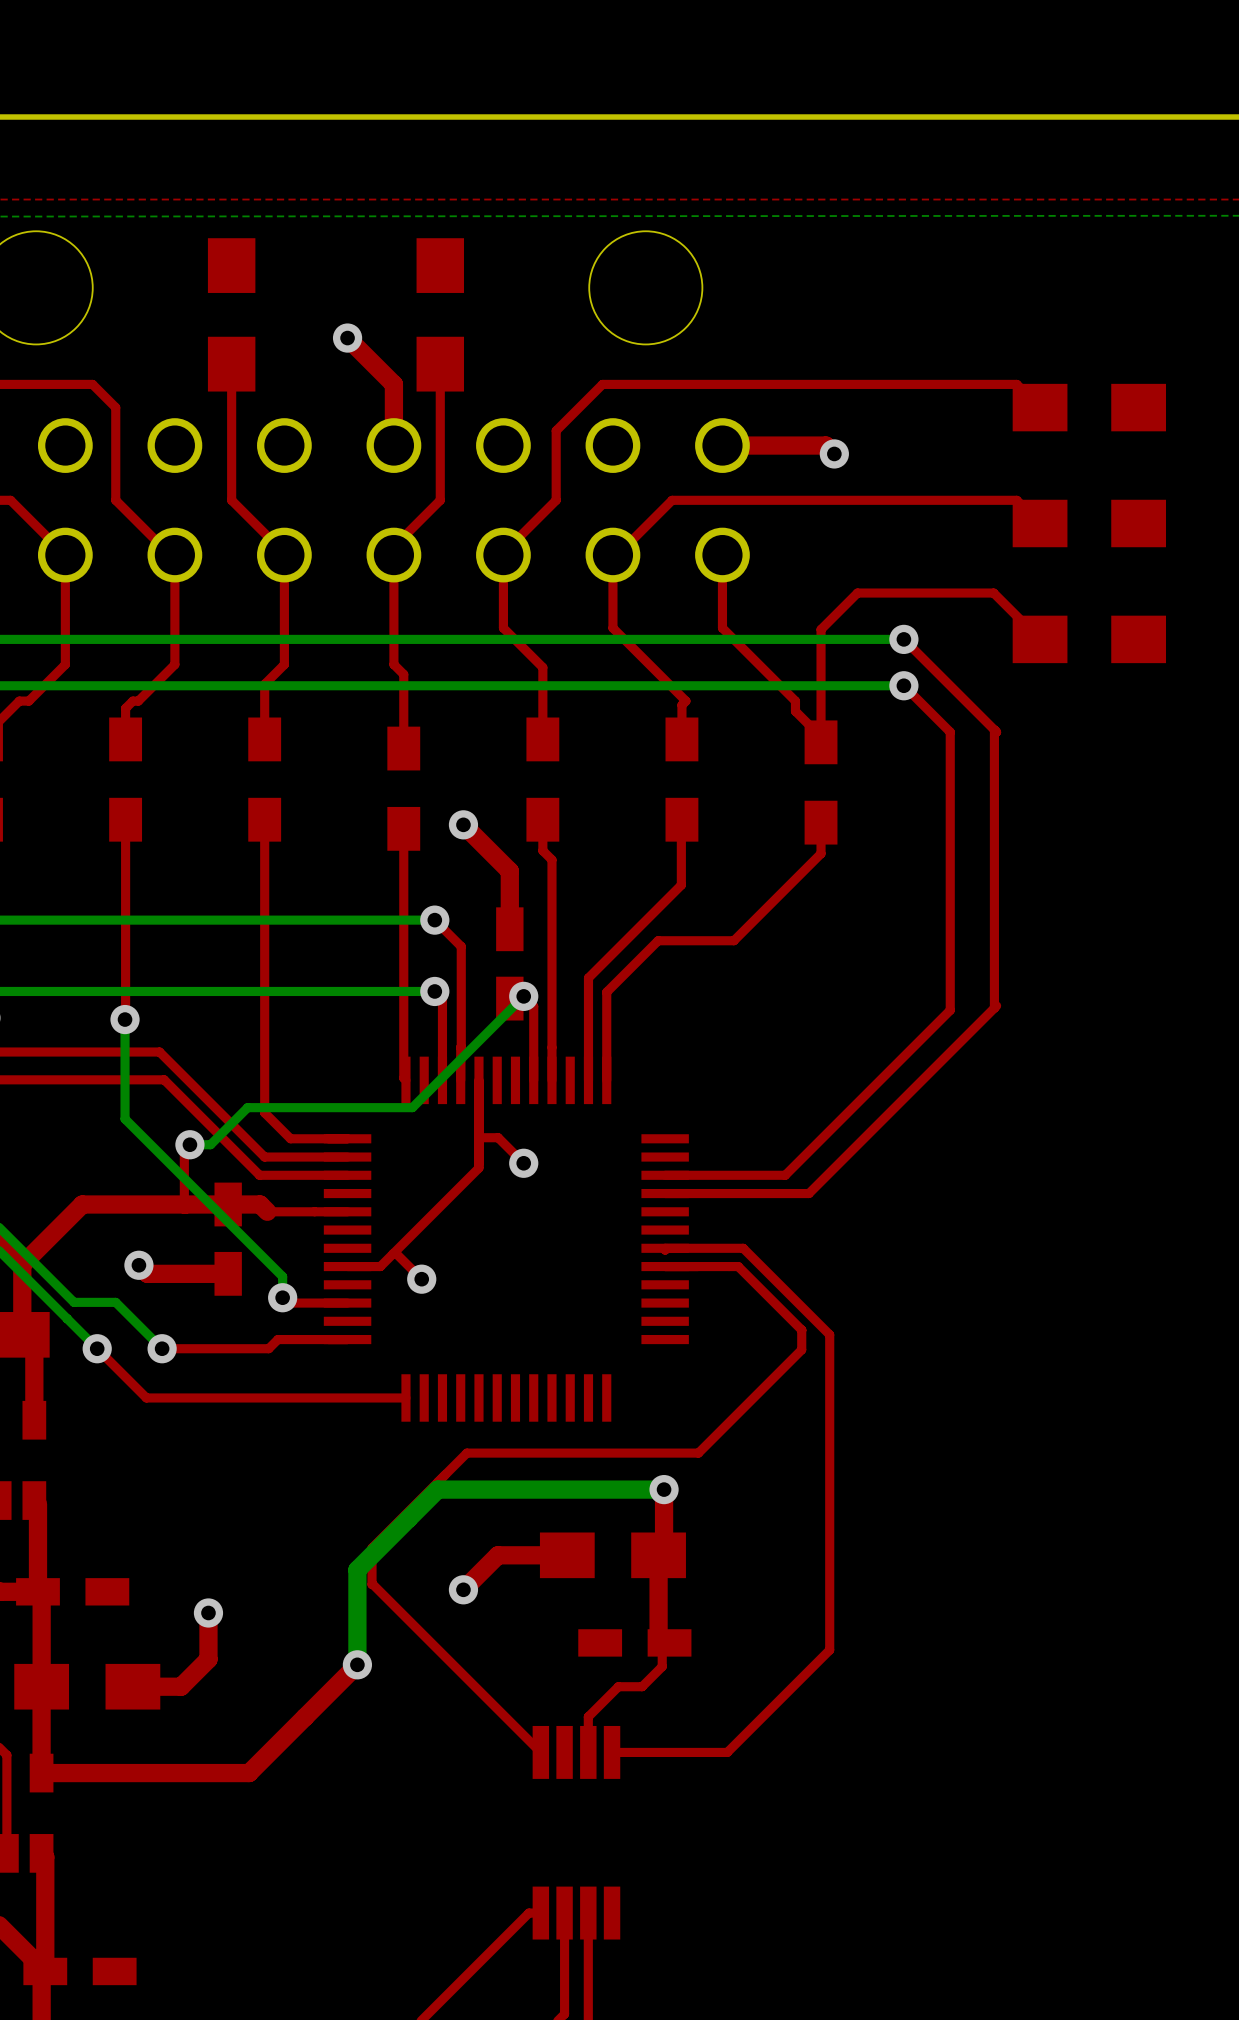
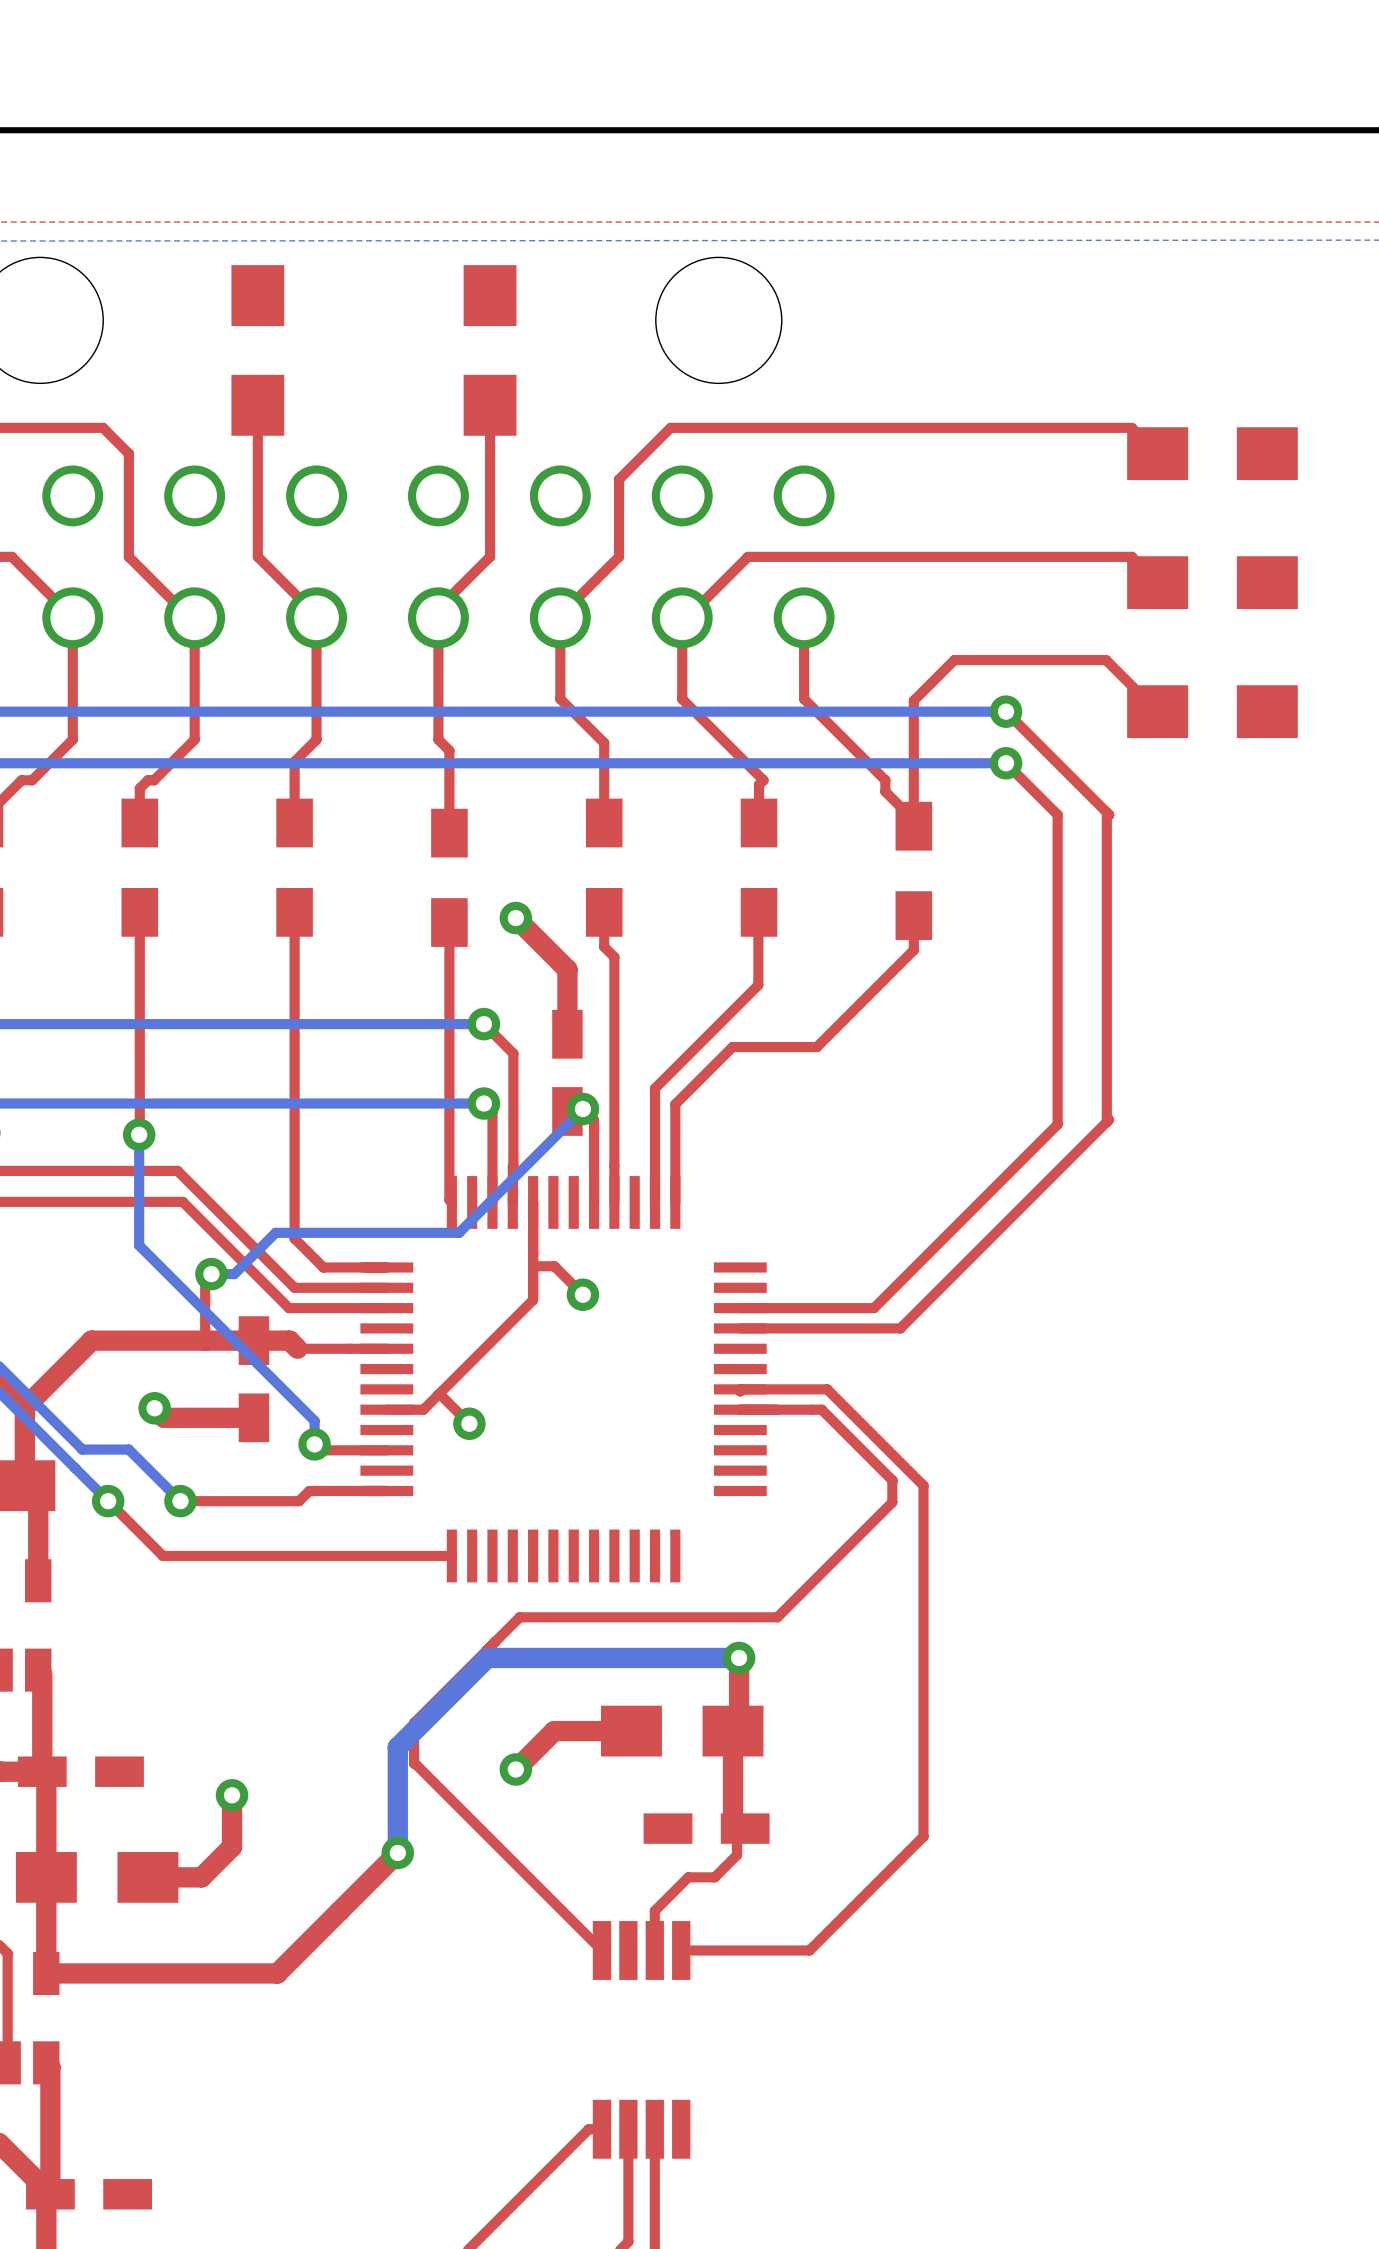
top track: (347, 338) (393, 384) (393, 445) -> none
via: (347, 338) -> none
top track: (722, 445) (825, 445) (834, 453) -> none
via: (834, 453) -> none

